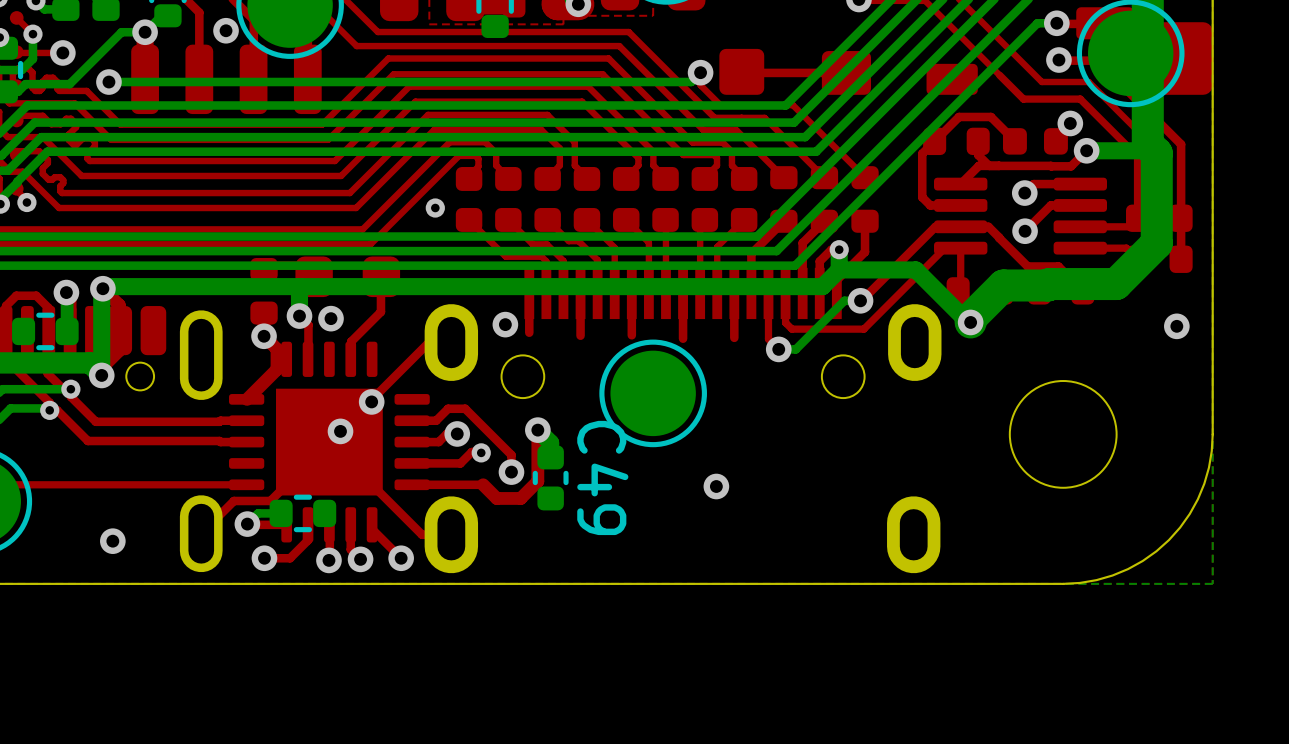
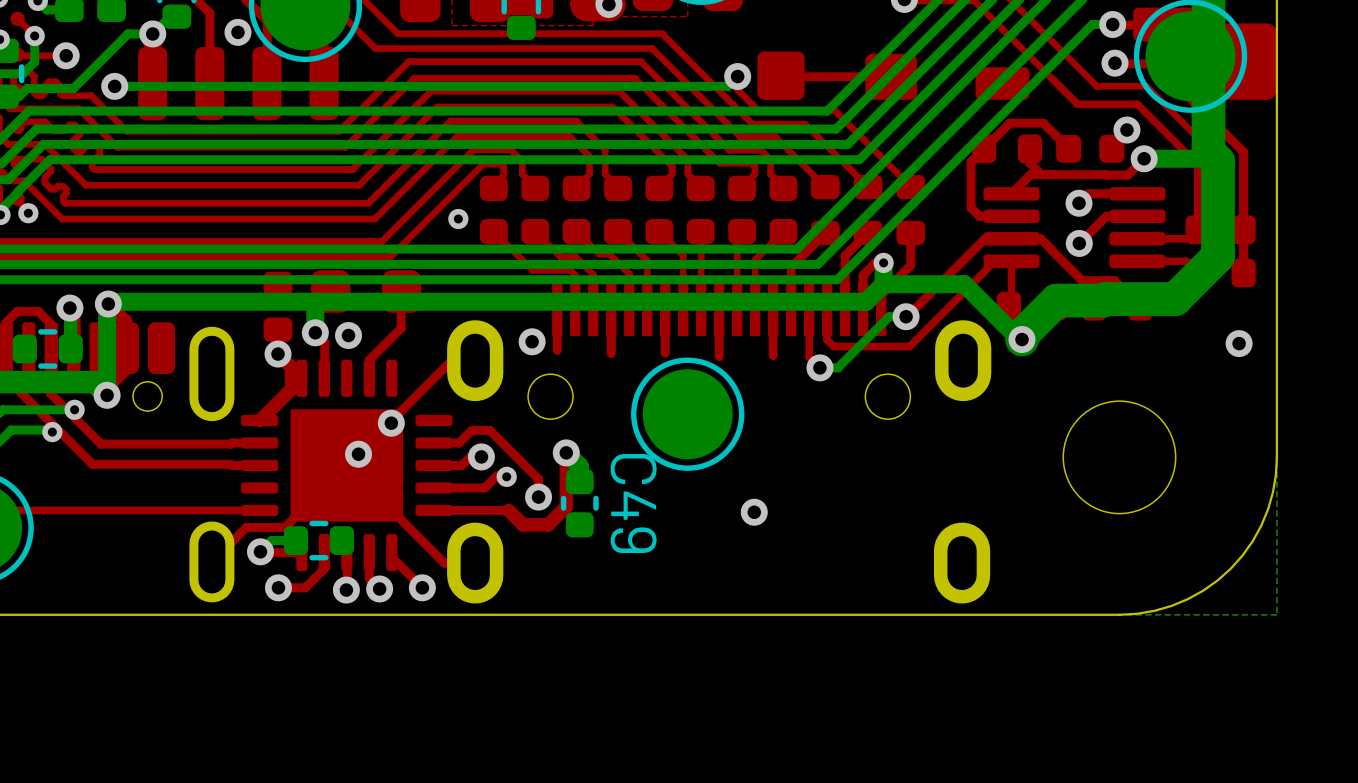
via: (112, 541) -> none

